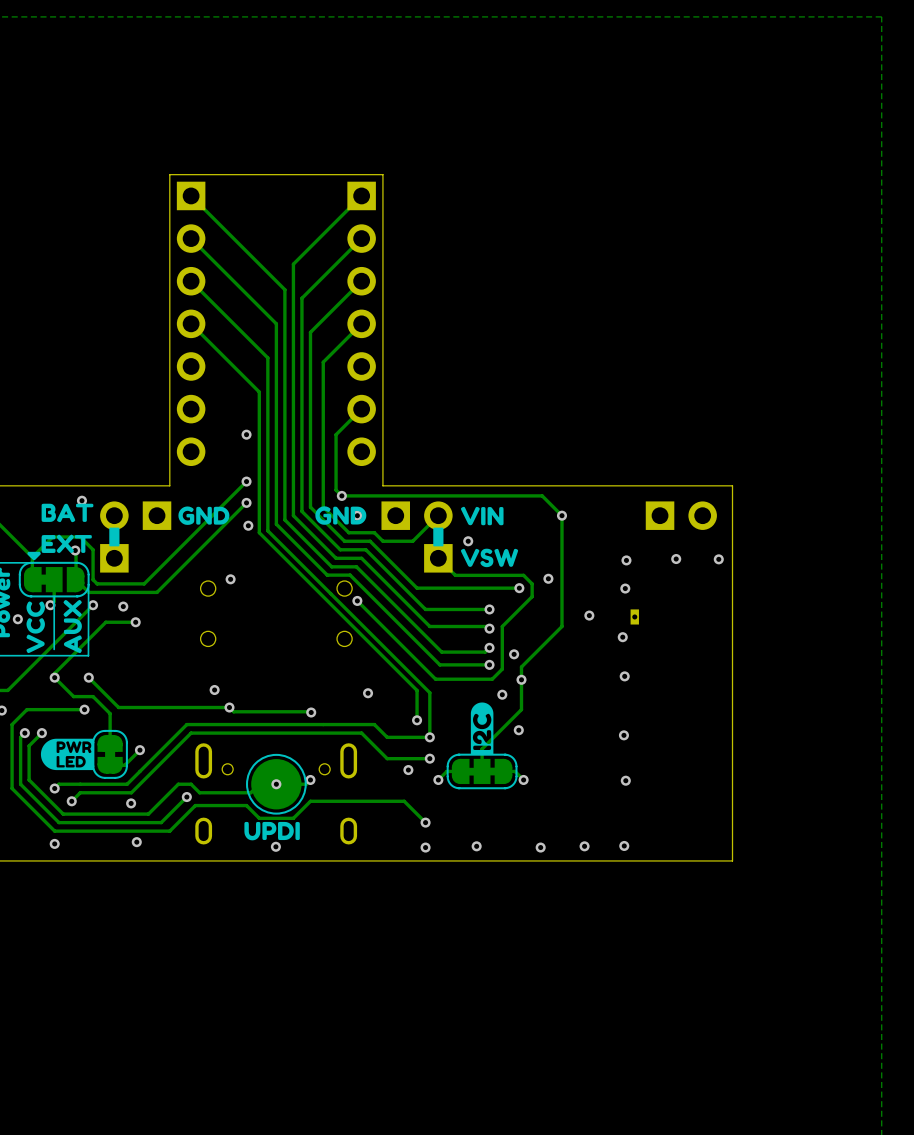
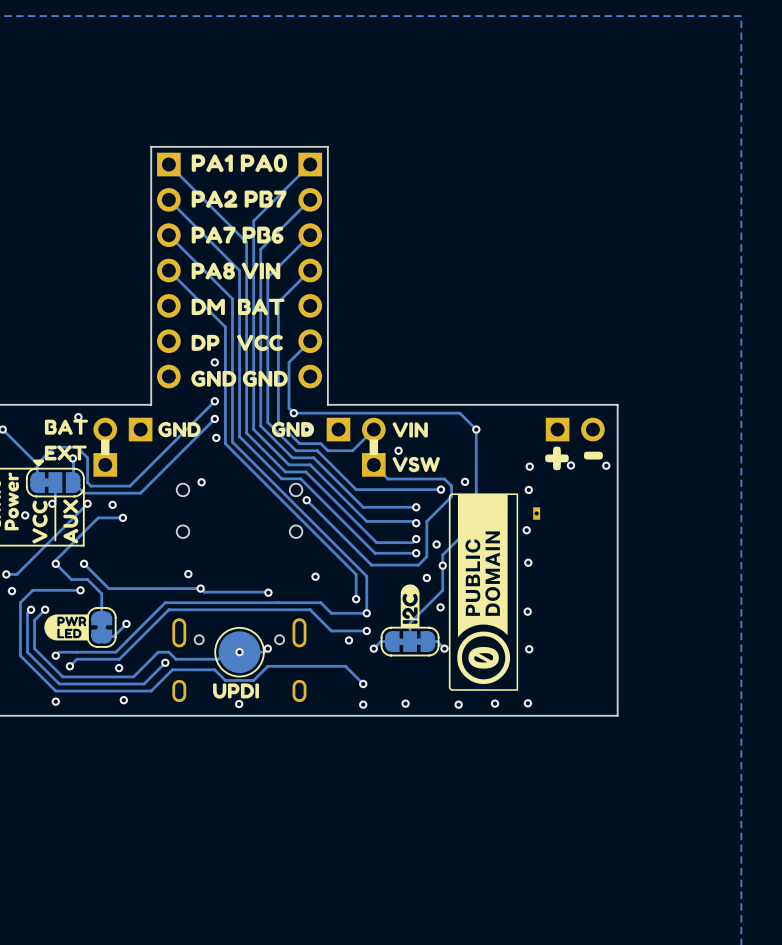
drawing: none -> [191, 154, 288, 387]
drawing: none -> [545, 446, 603, 471]
drawing: none -> [448, 493, 519, 691]

